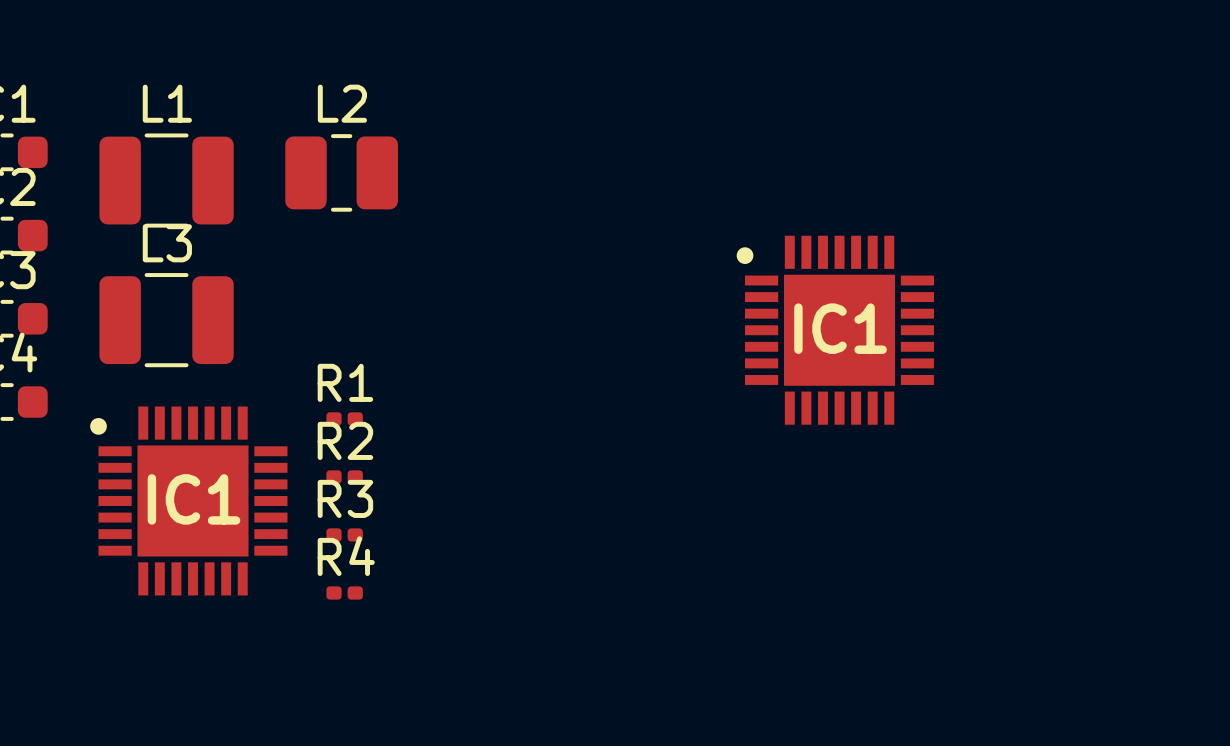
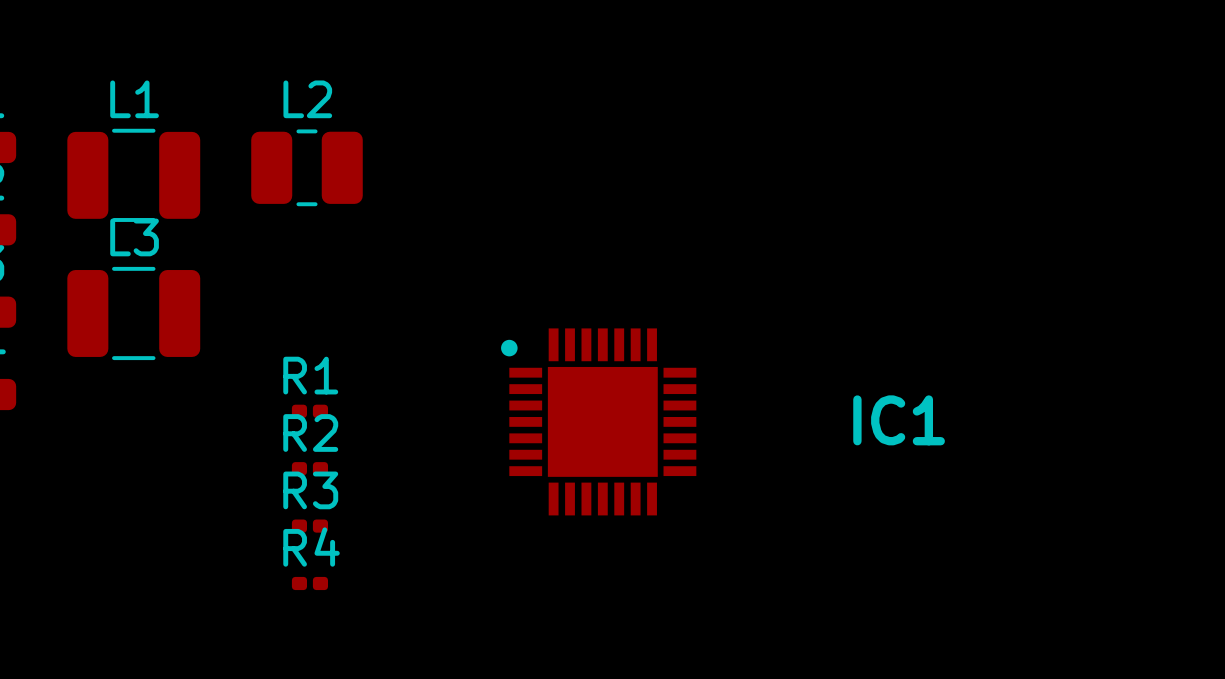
IC1 name position: IC1 (840, 328) -> IC1 (899, 420)
IC1 position: (835, 330) -> (598, 421)
IC1: (188, 500) -> none

